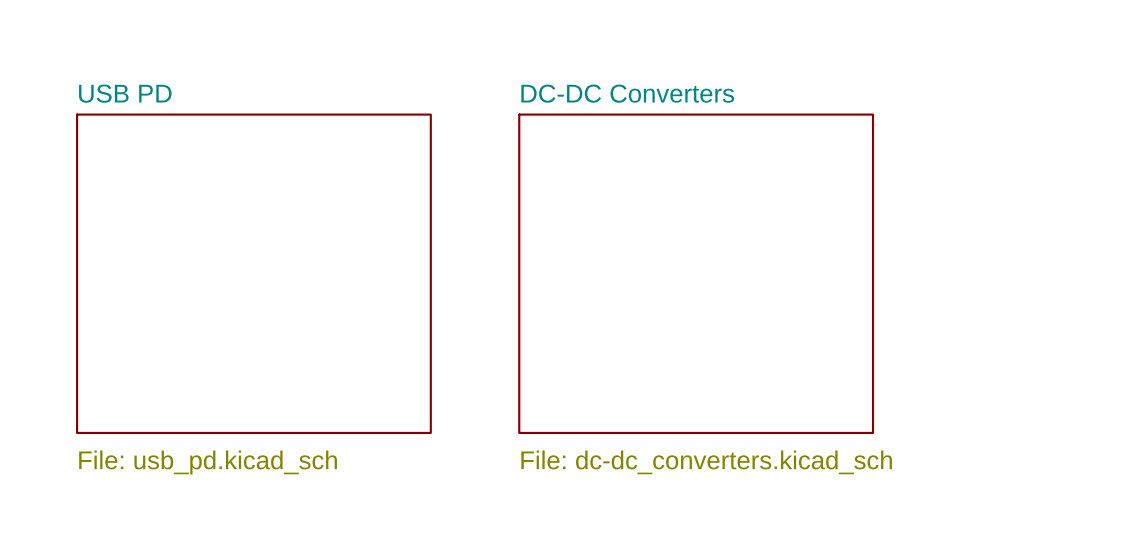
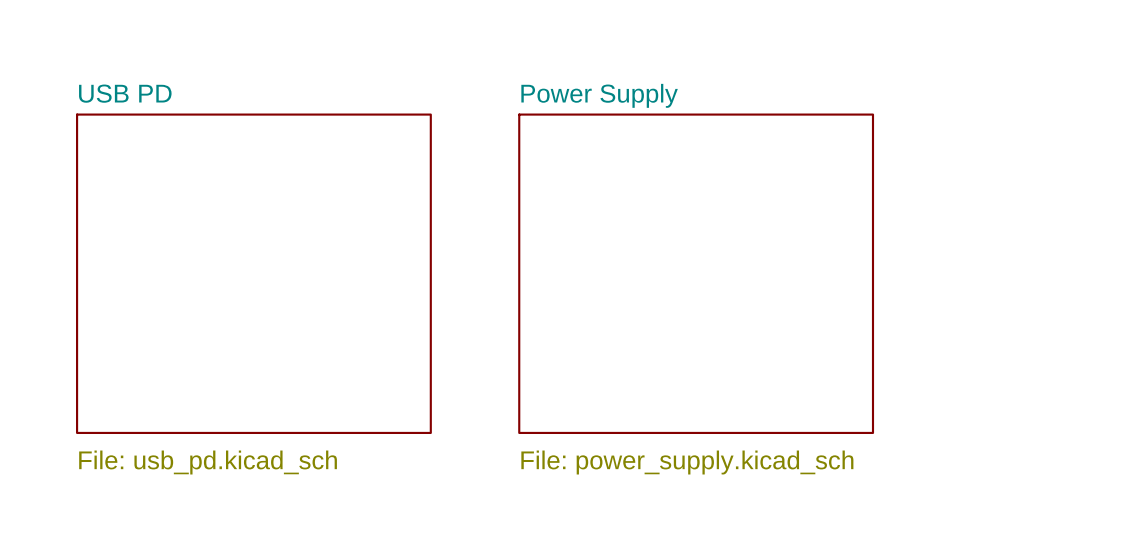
sheet DC-DC Converters name: DC-DC Converters (627, 93) -> Power Supply (599, 95)
sheet DC-DC Converters value: File: dc-dc_converters.kicad_sch (706, 462) -> File: power_supply.kicad_sch (687, 462)

